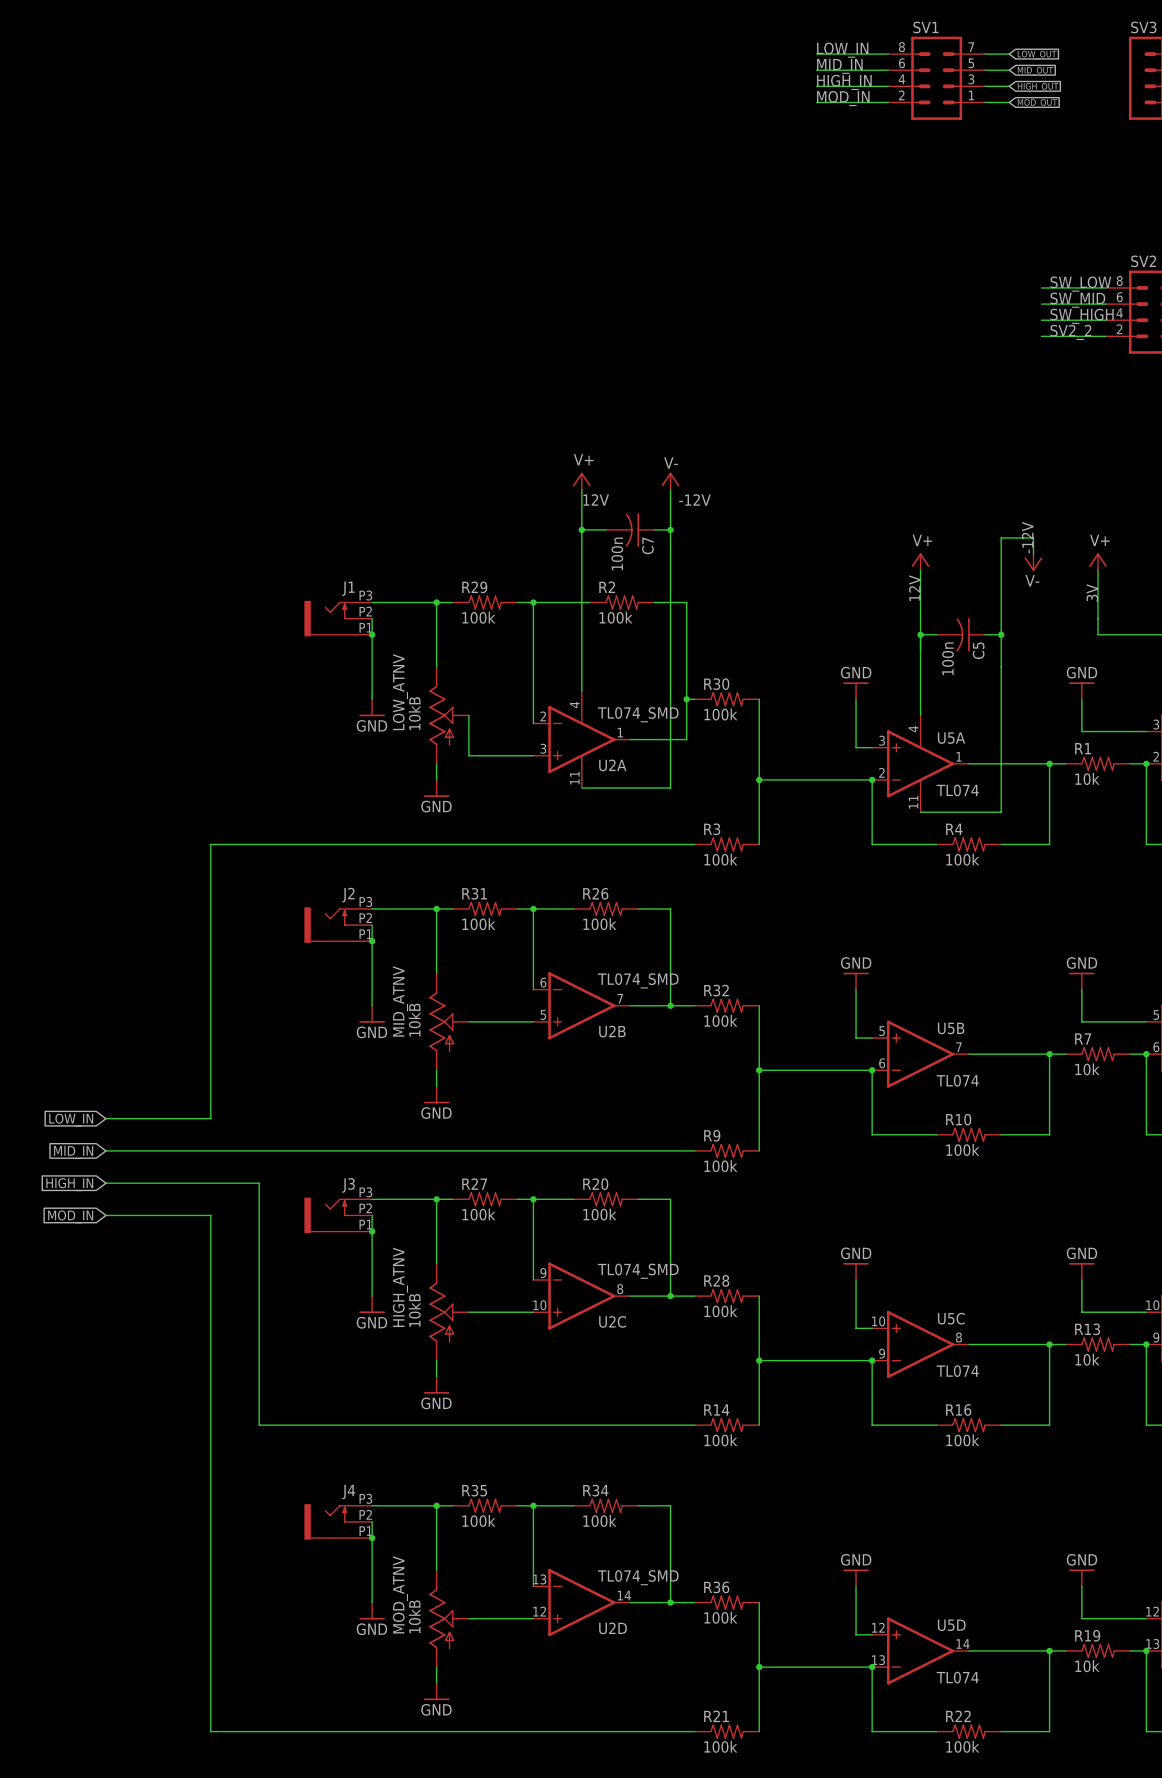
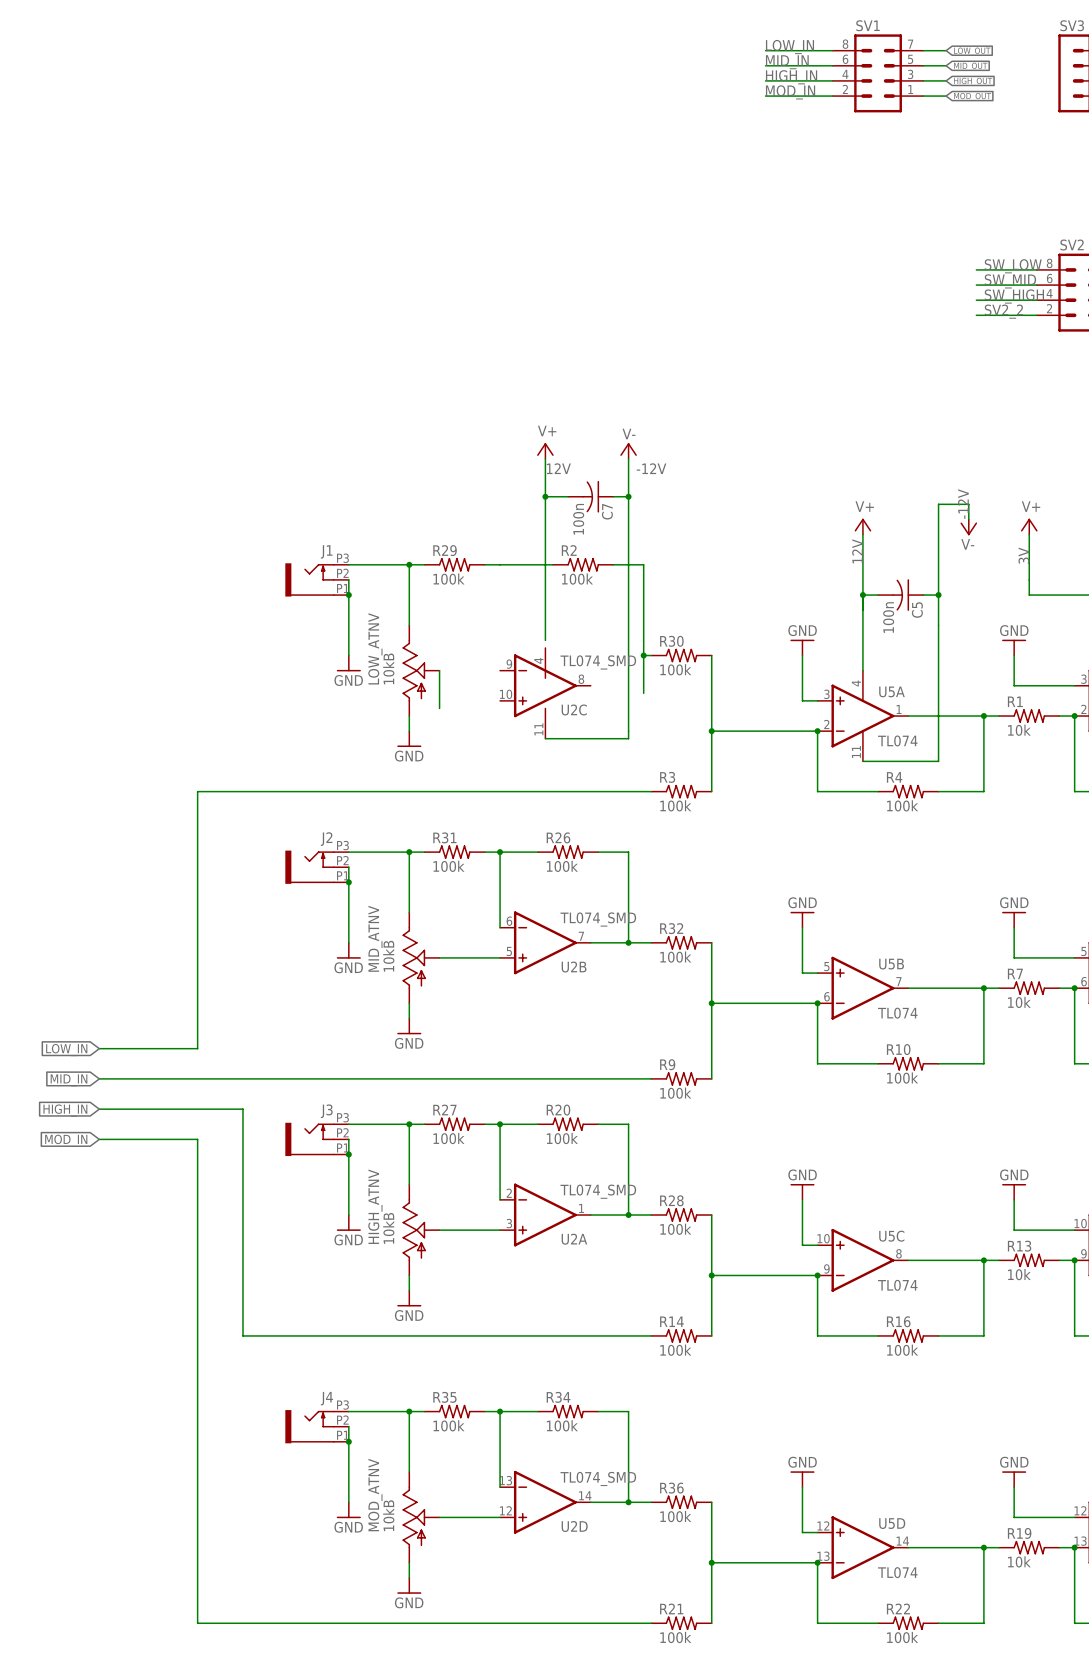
wire: (533, 602) (533, 723) -> none
junction: (533, 602) -> none
wire: (581, 683) (581, 691) -> none
U2A position: (581, 739) -> (545, 1215)
wire: (630, 739) (686, 739) -> none
wire: (468, 755) (533, 755) -> none
U2C position: (581, 1296) -> (545, 685)

